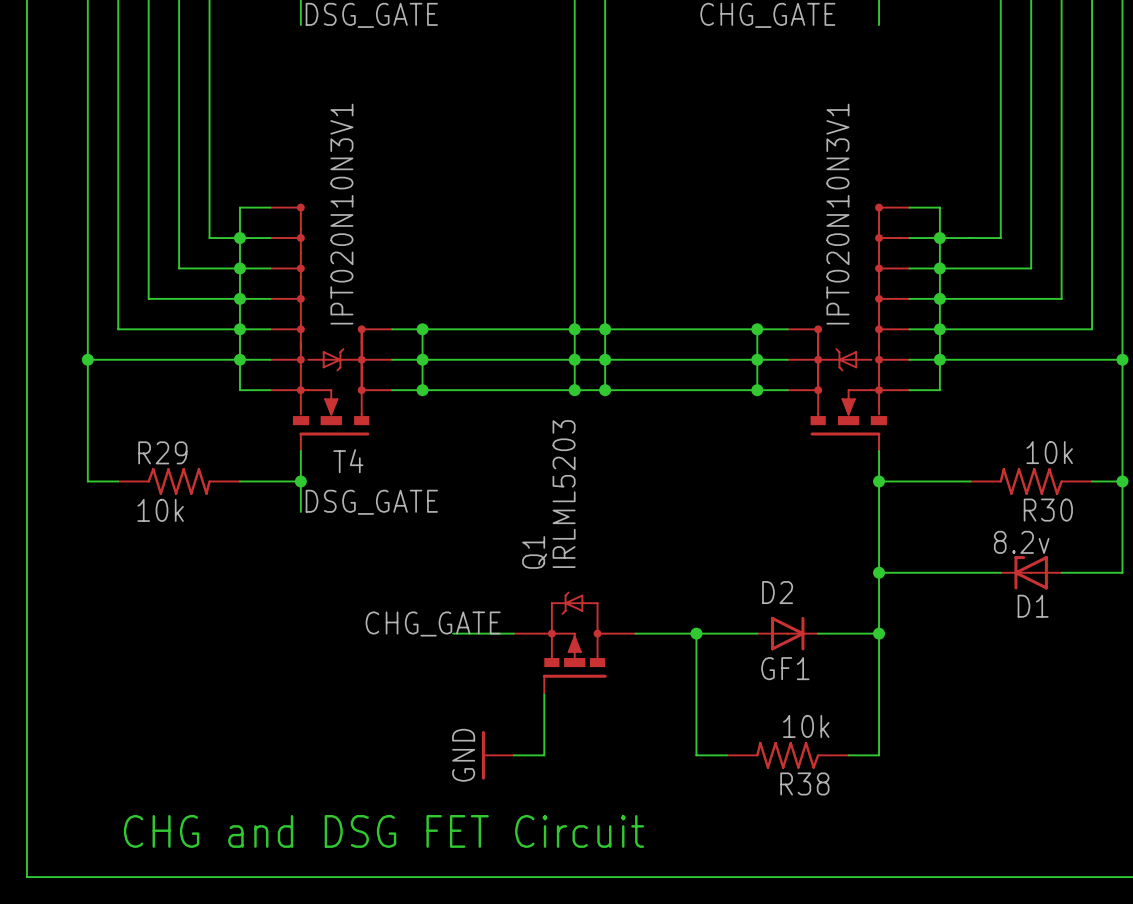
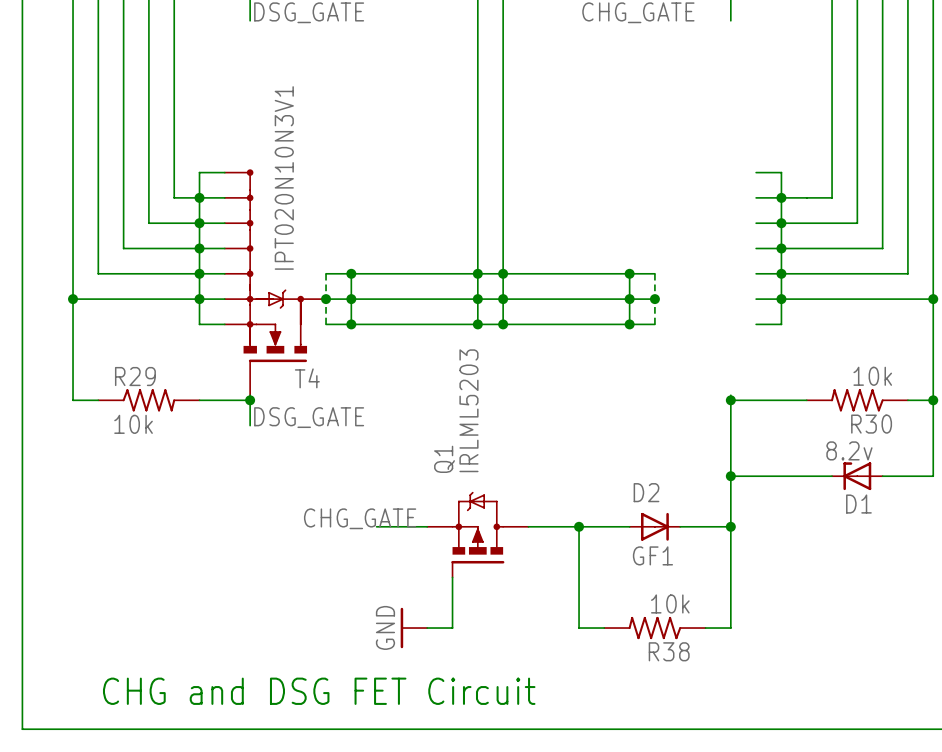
T4 symbol: [270, 203, 393, 452] -> [224, 169, 327, 397]
part: IPT020N10N3V1 (848, 327) -> none
wire: none -> (326, 273) (326, 324)
wire: none -> (654, 273) (654, 324)
junction: none -> (326, 299)
junction: none -> (654, 299)
wire: (879, 451) (879, 475) -> none
T4 name position: T4 (348, 461) -> T4 (307, 378)

